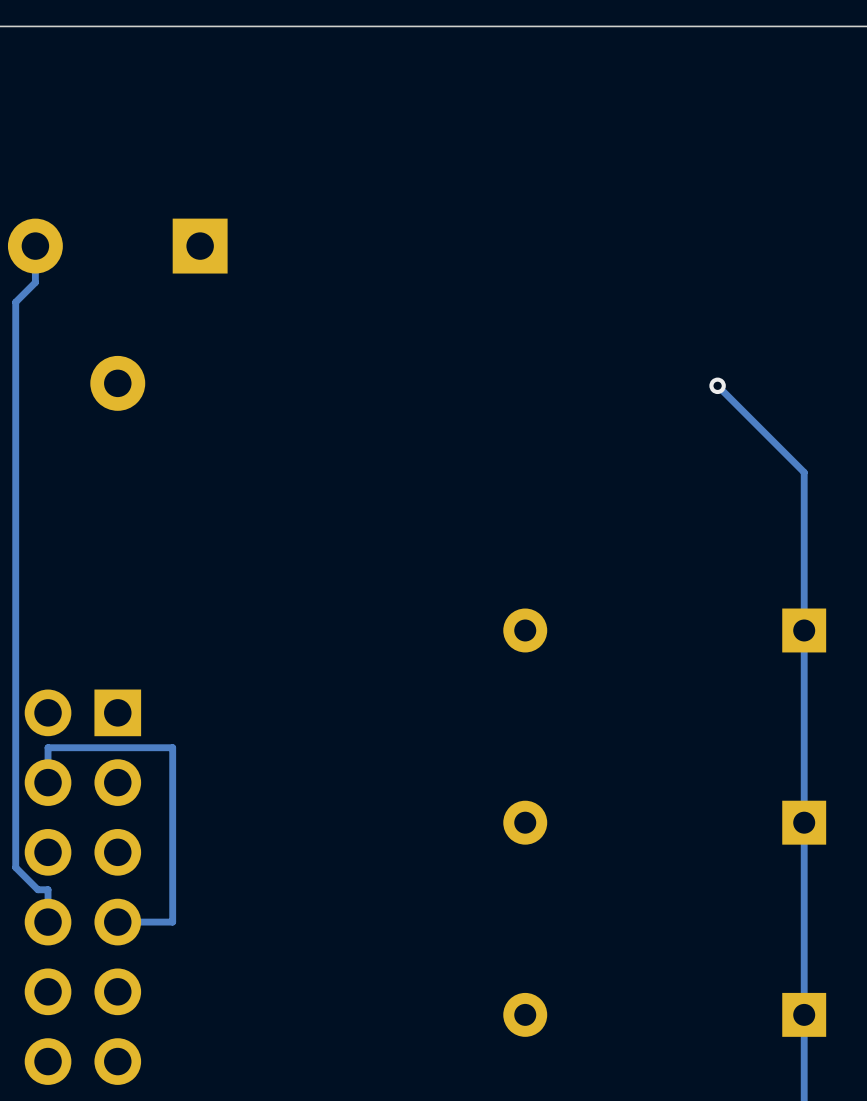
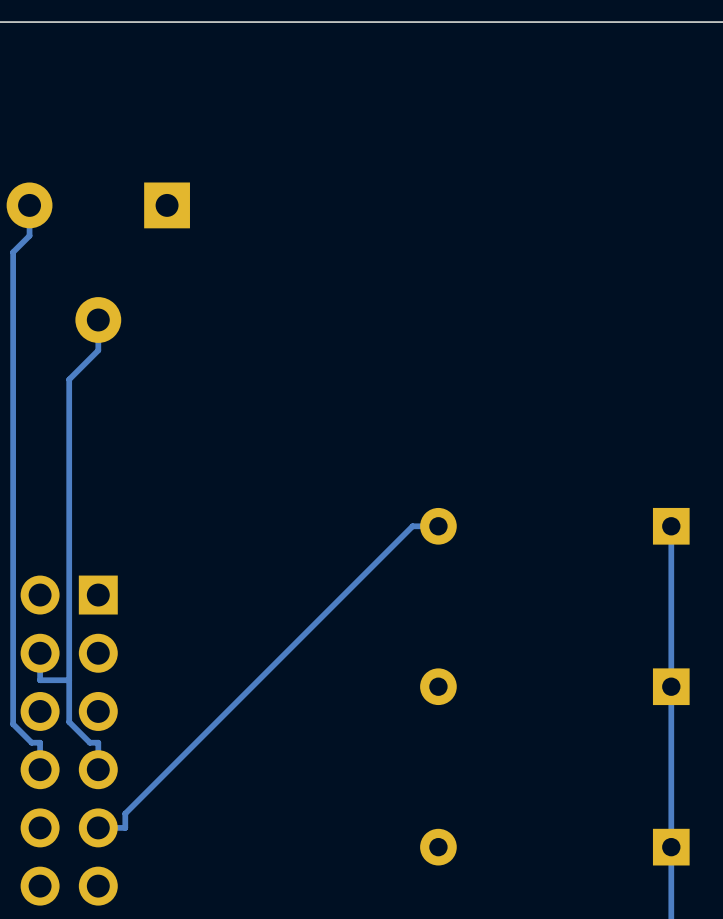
track: none -> (98, 320) (98, 350) (69, 379) (69, 722) (89, 742) (98, 742) (98, 769)
track: (717, 385) (804, 472) (804, 630) -> none
via: (717, 385) -> none
track: none -> (438, 526) (412, 526) (125, 813) (125, 827) (98, 827)
track: (48, 782) (48, 747) (172, 747) (172, 922) (117, 922) -> (40, 653) (40, 680) (69, 680)

